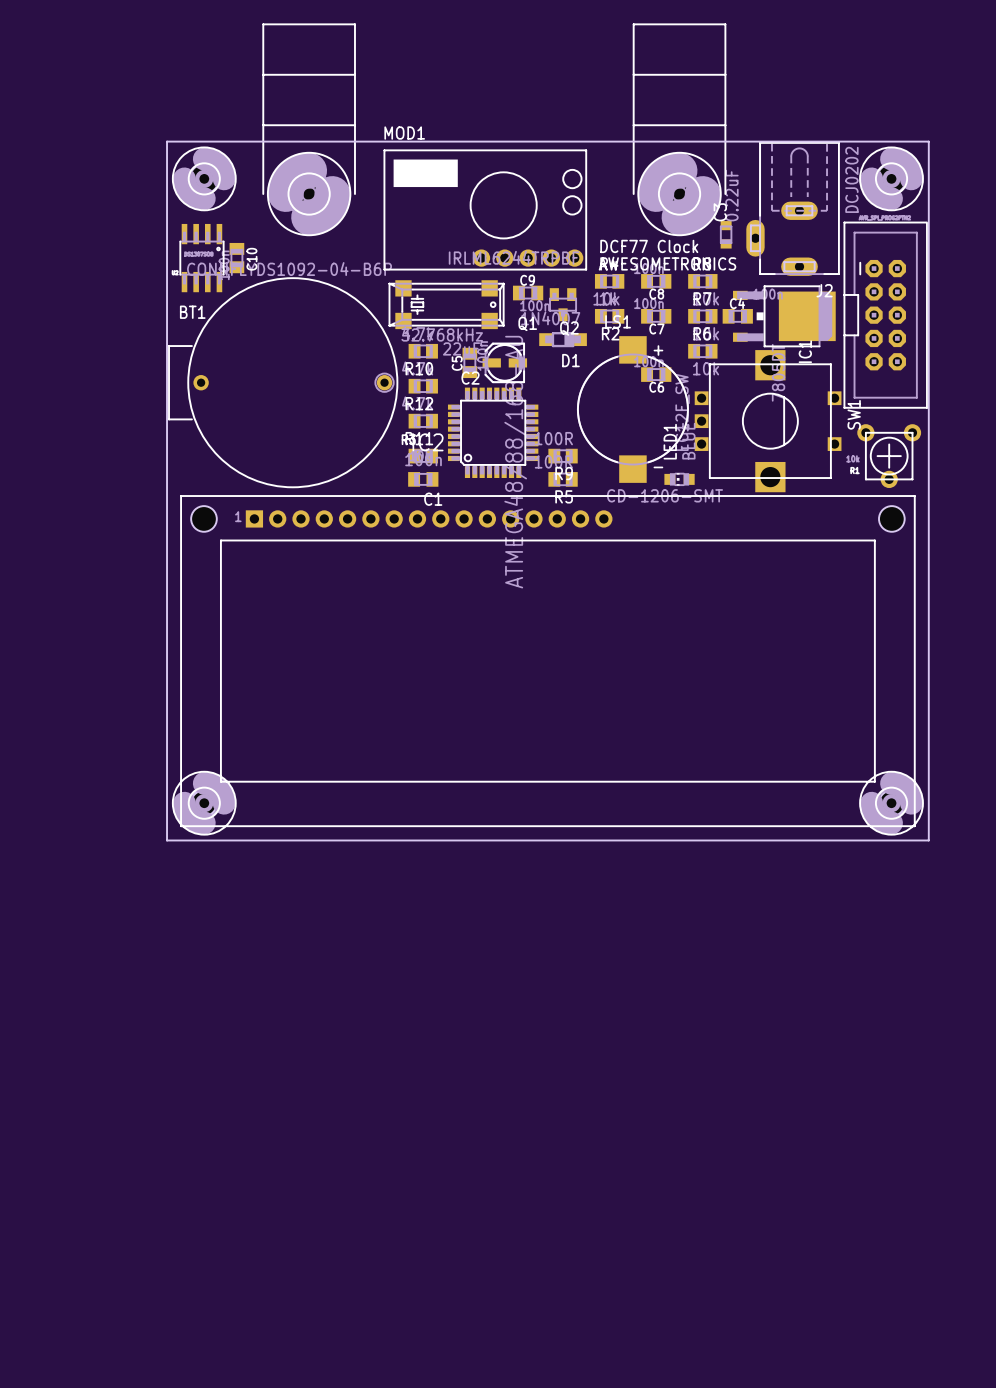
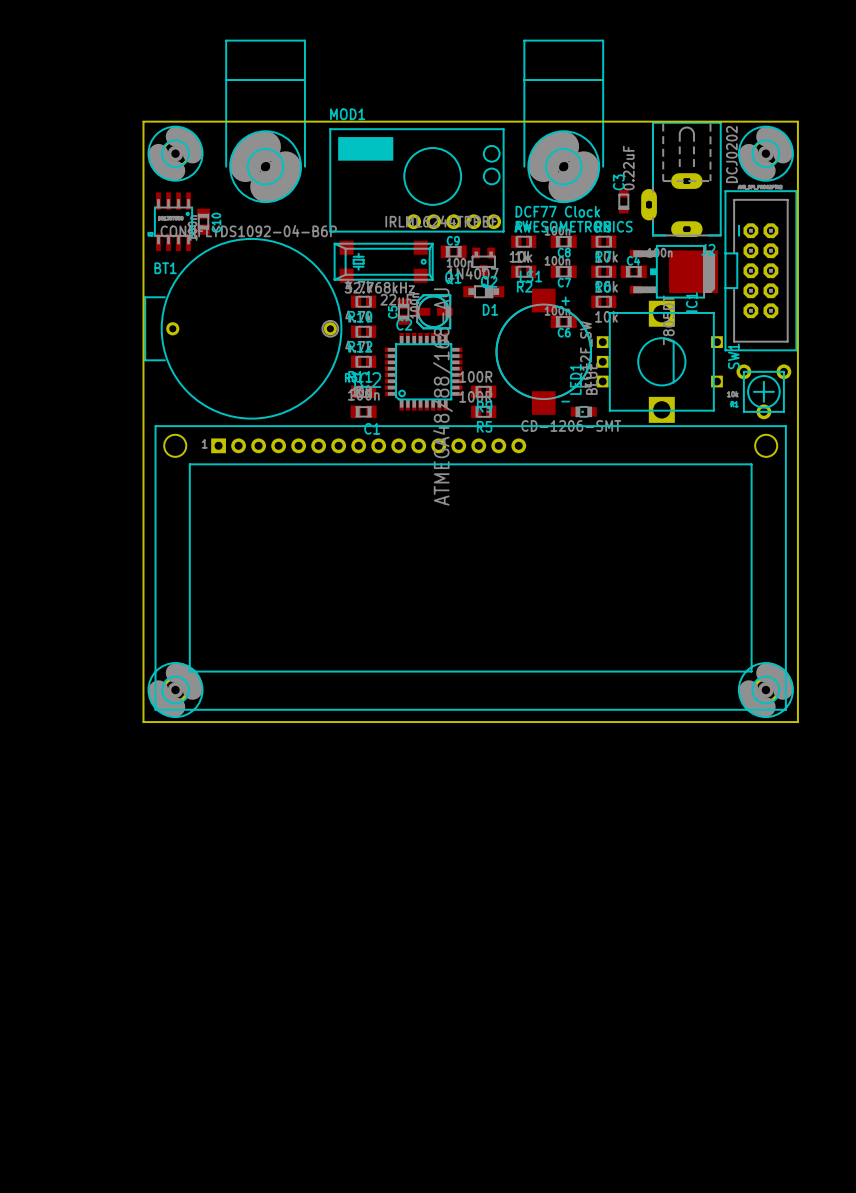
part: (309, 129) -> none
part: (679, 129) -> none
part: none -> (265, 121)
part: none -> (563, 121)

